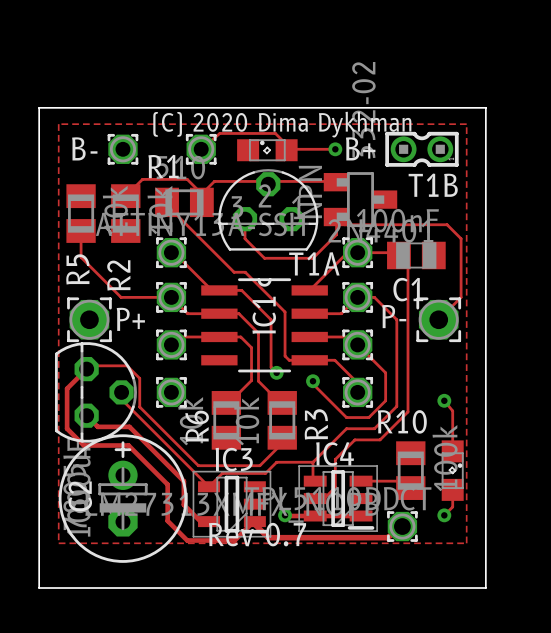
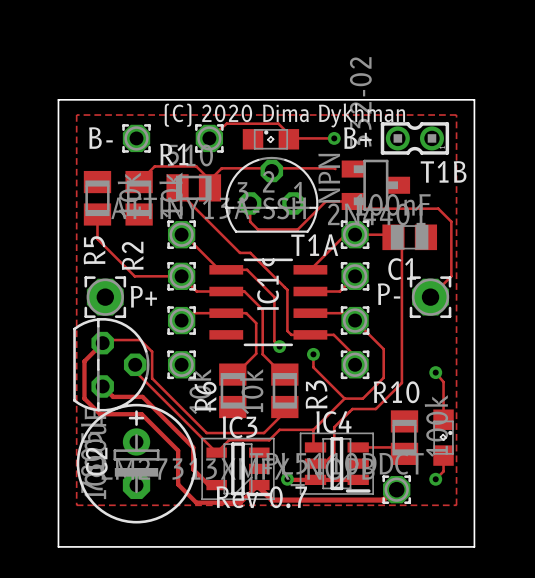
T1B position: (360, 199) -> (375, 185)
track: (363, 224) (344, 224) (336, 217) (336, 234) (312, 258) (264, 258) (253, 247) -> (360, 208) (353, 201) (325, 201) (297, 229) (257, 229)
track: (357, 297) (374, 297) (396, 319) (396, 406) (374, 428) (366, 428) -> (381, 346) (383, 349) (383, 377) (362, 398)
track: (385, 372) (385, 400) (368, 417) (346, 417) (312, 384) -> (344, 398) (313, 367) (313, 356)

